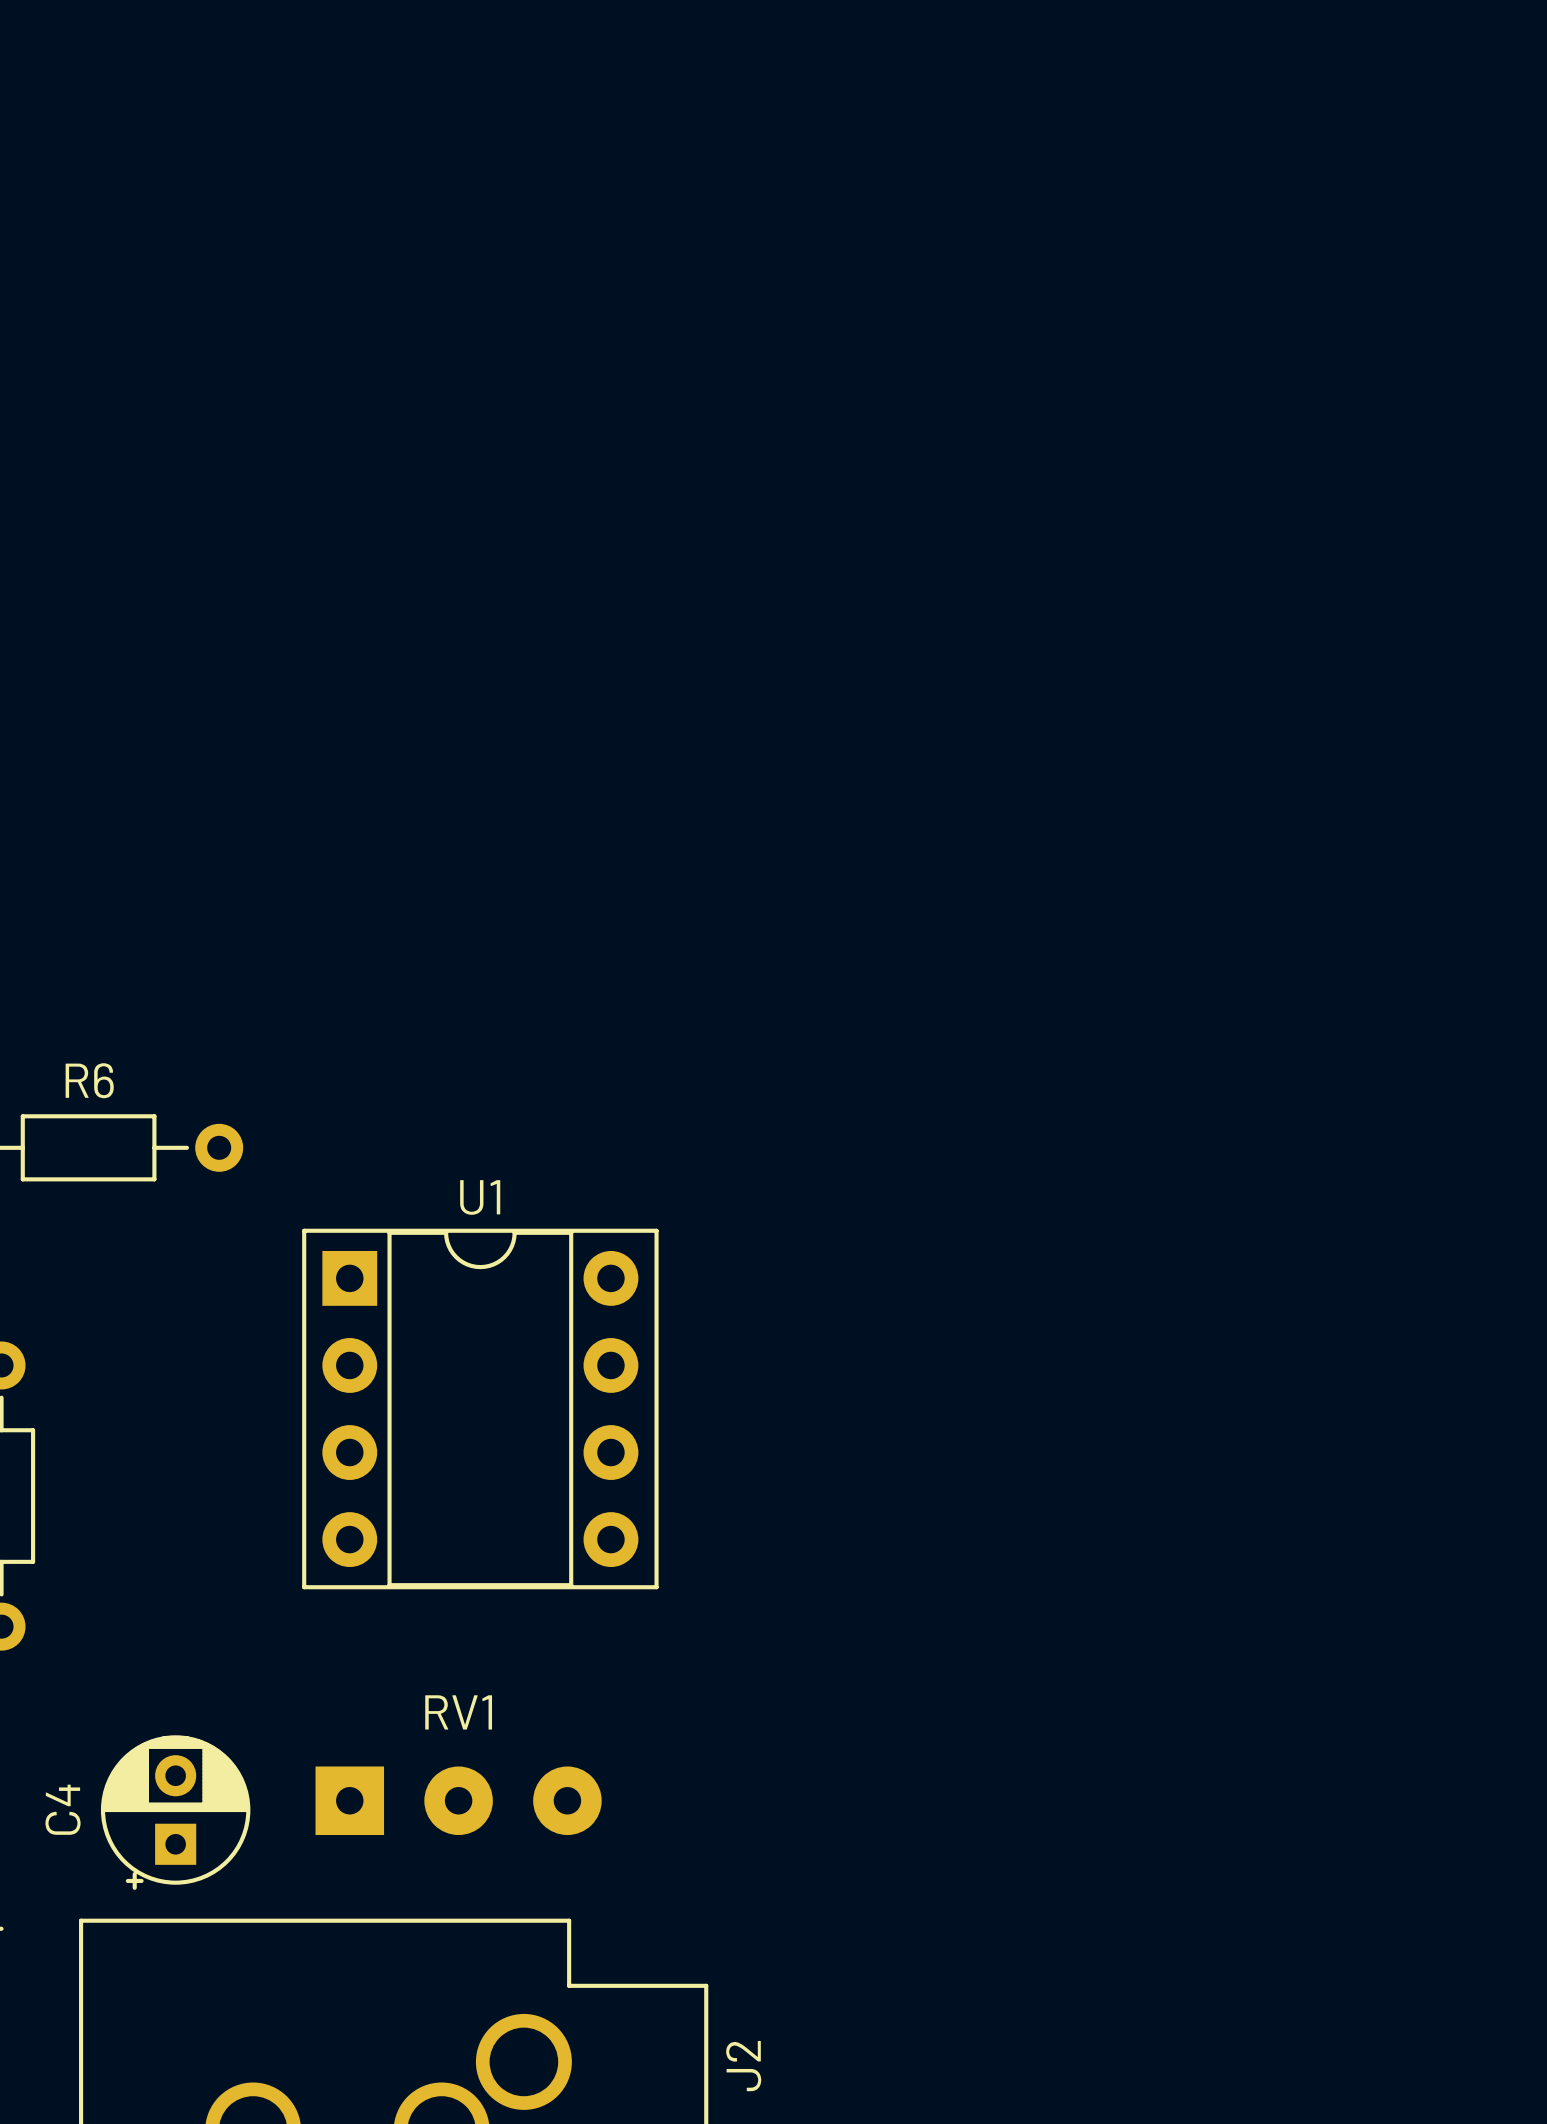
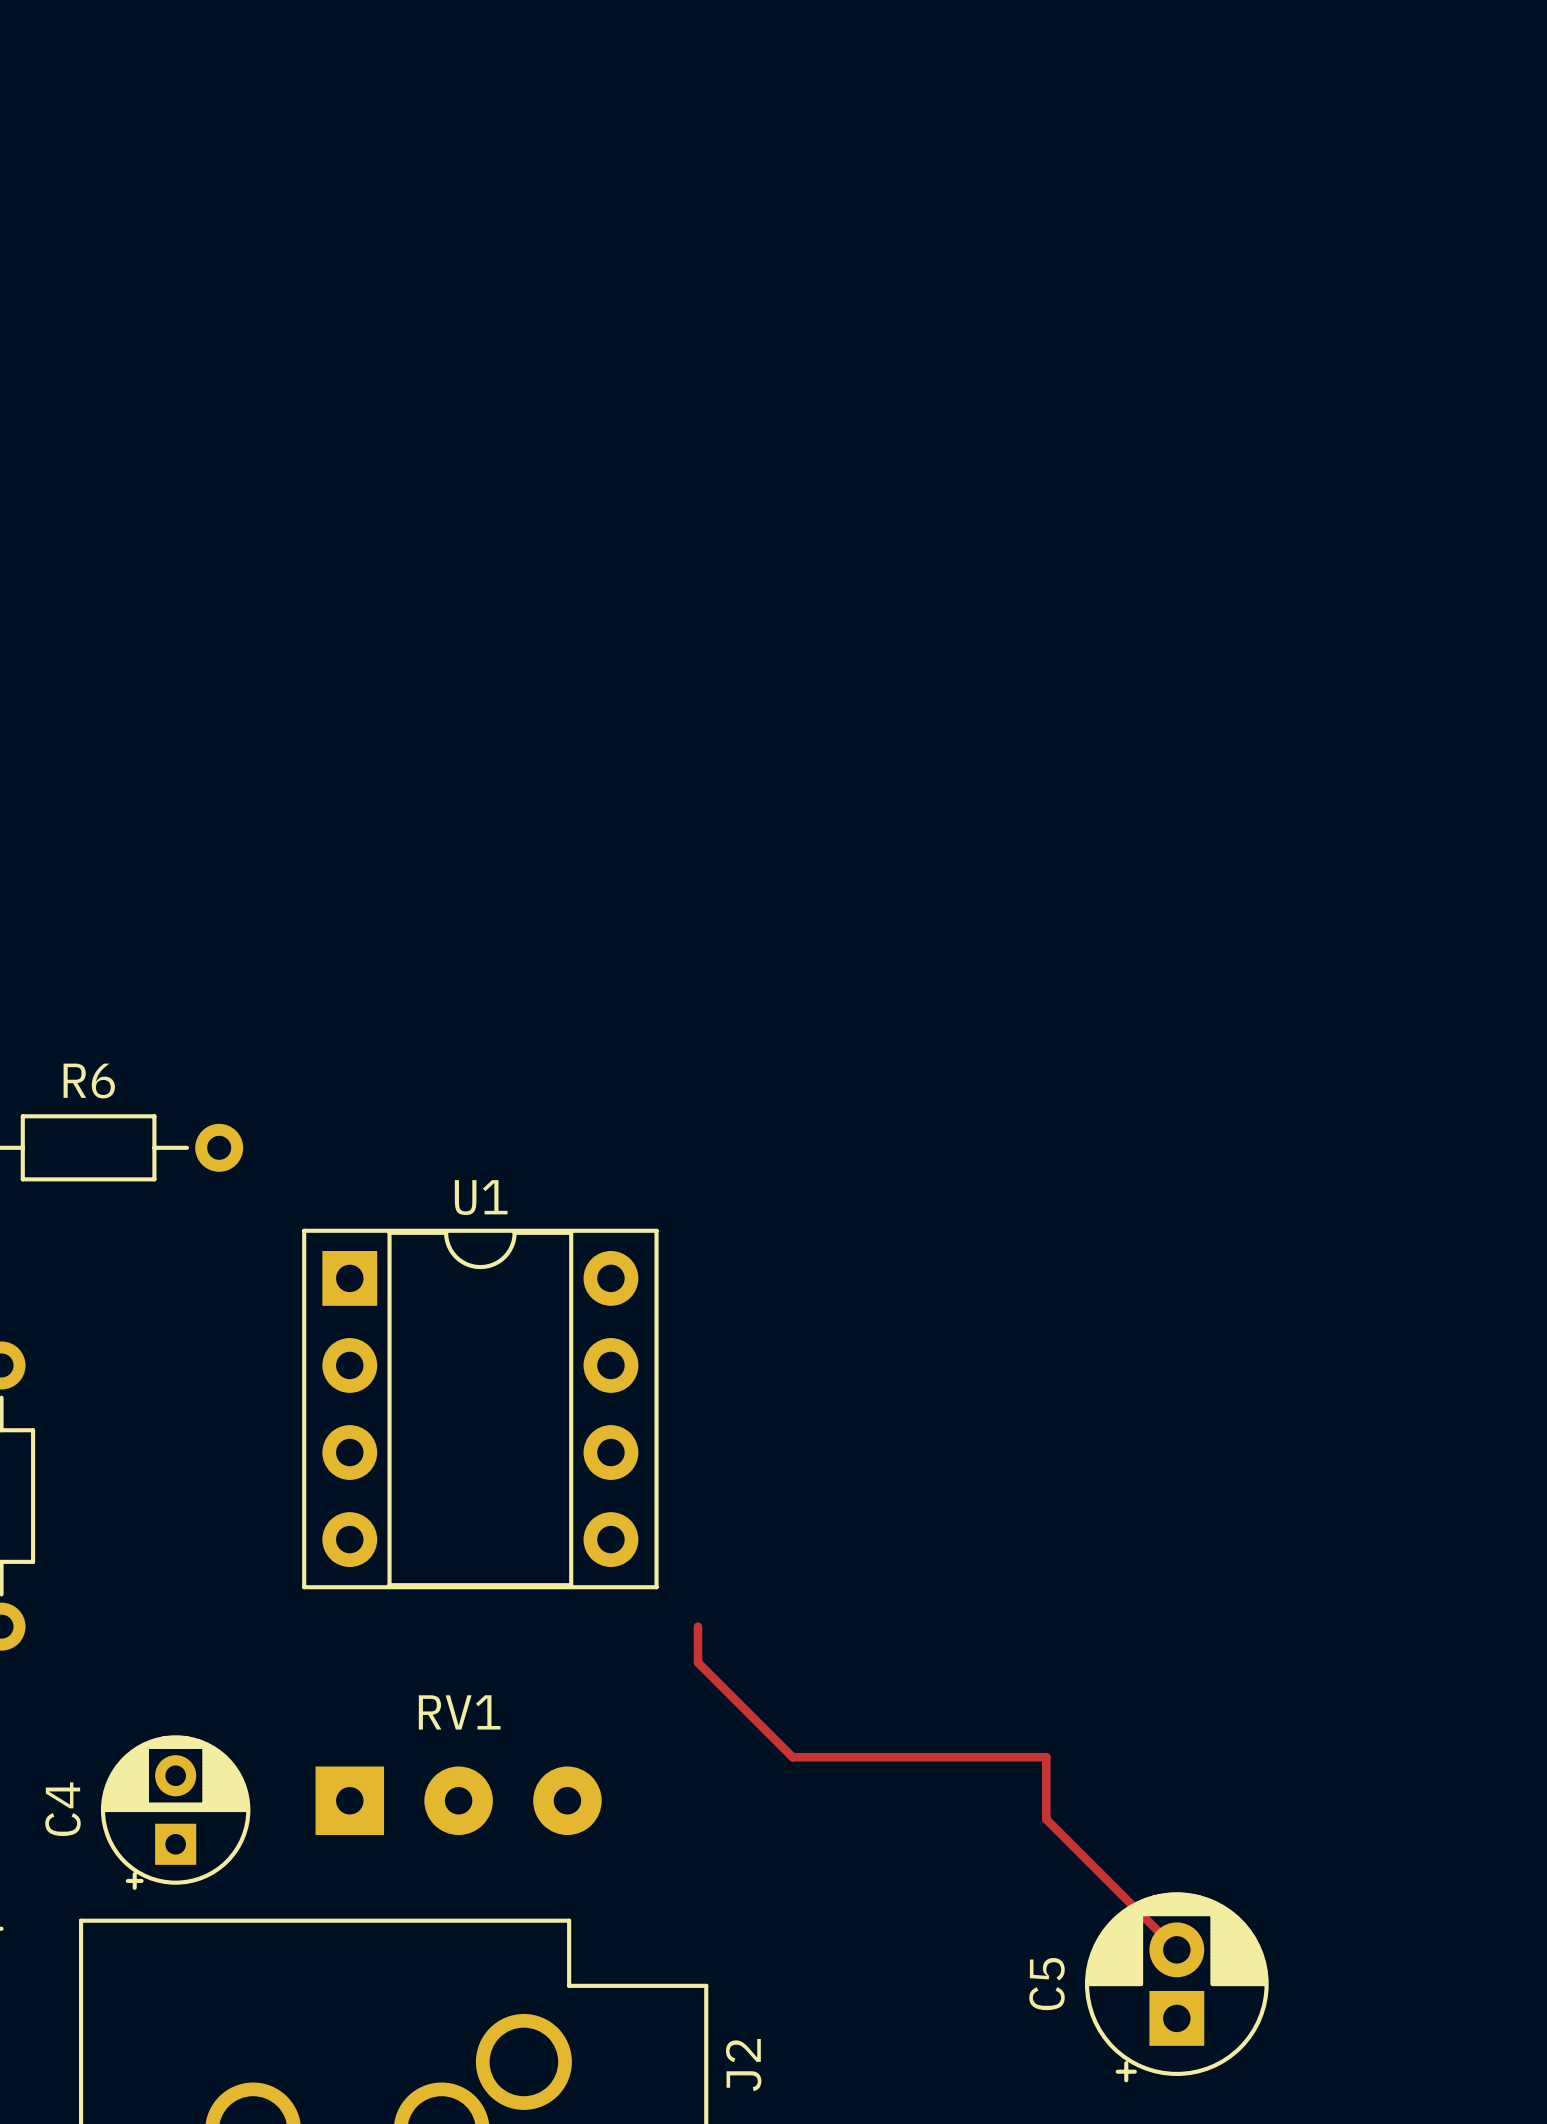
track: none -> (698, 1626) (698, 1662) (792, 1757) (1046, 1757) (1046, 1819) (1176, 1949)
C5: none -> (1176, 1987)

